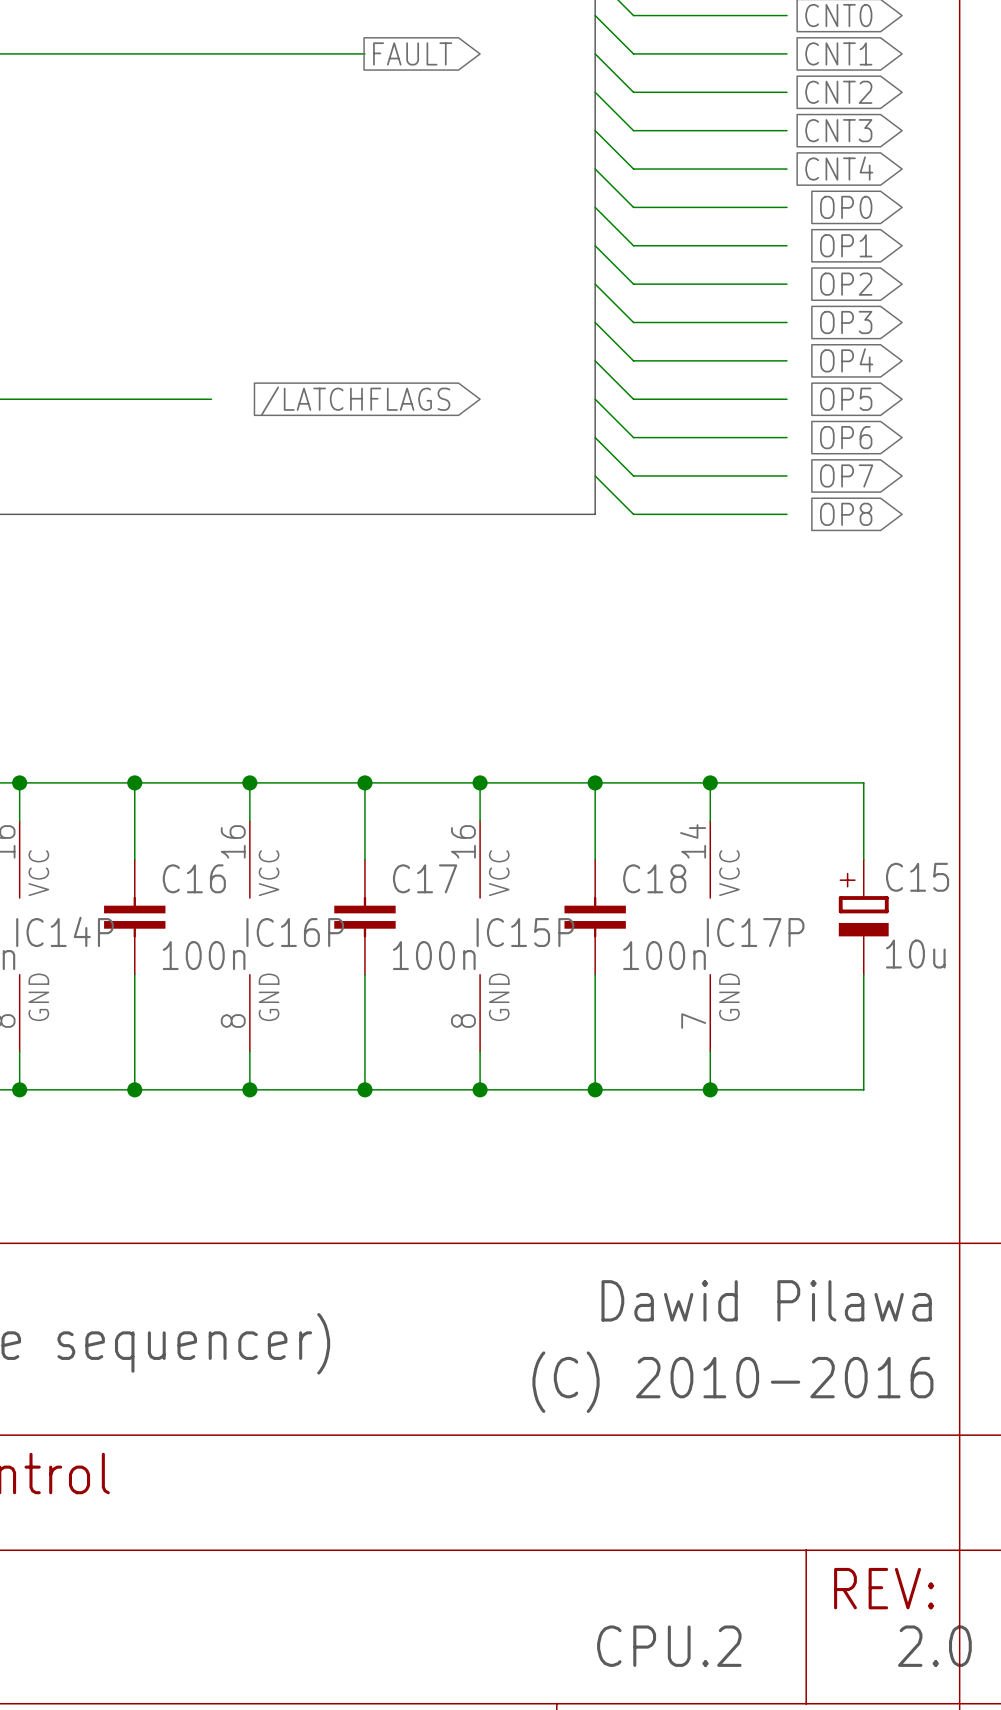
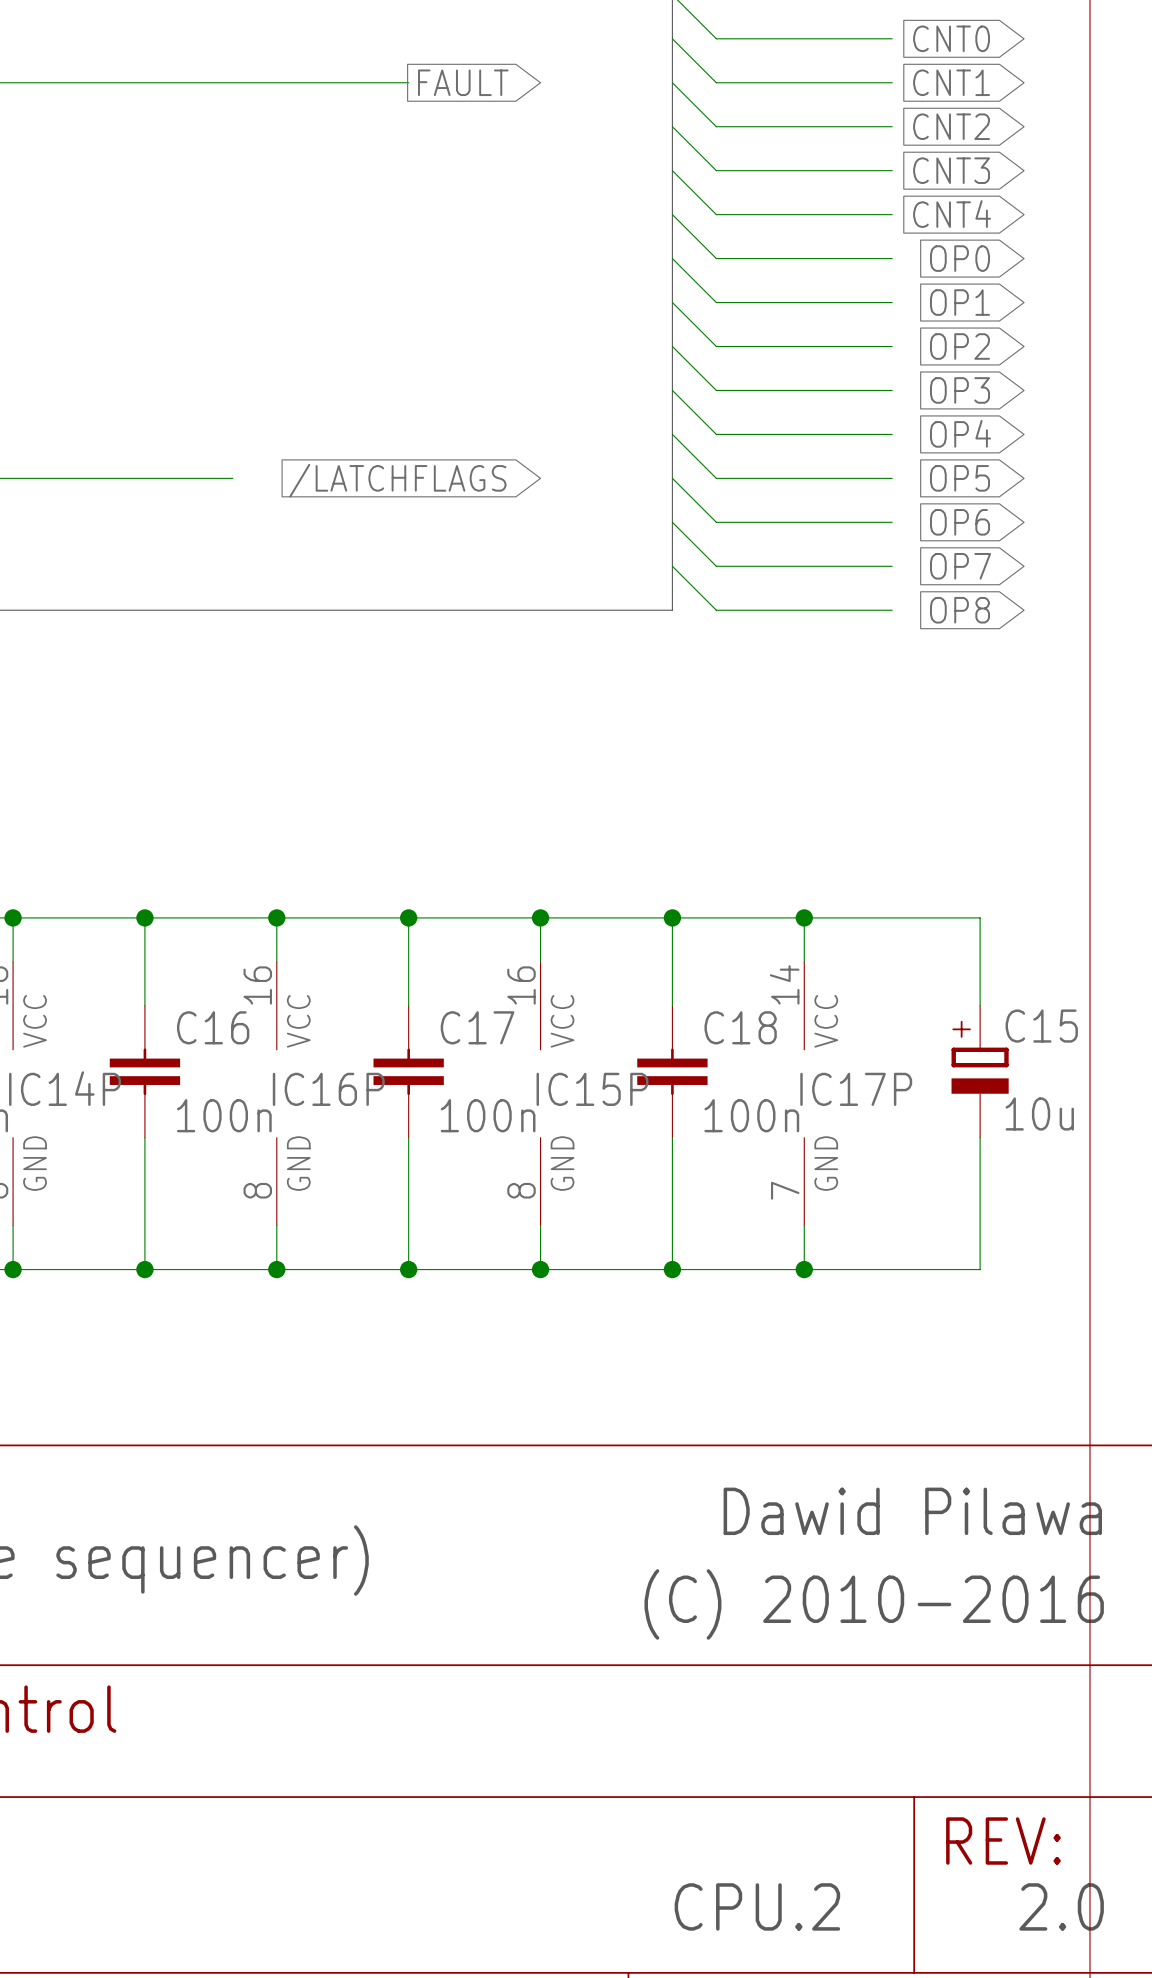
text position: Dawid Pilawa (766, 1300) -> Dawid Pilawa (912, 1511)
text position: (C) 2010-2016 (732, 1382) -> (C) 2010-2016 (874, 1604)

